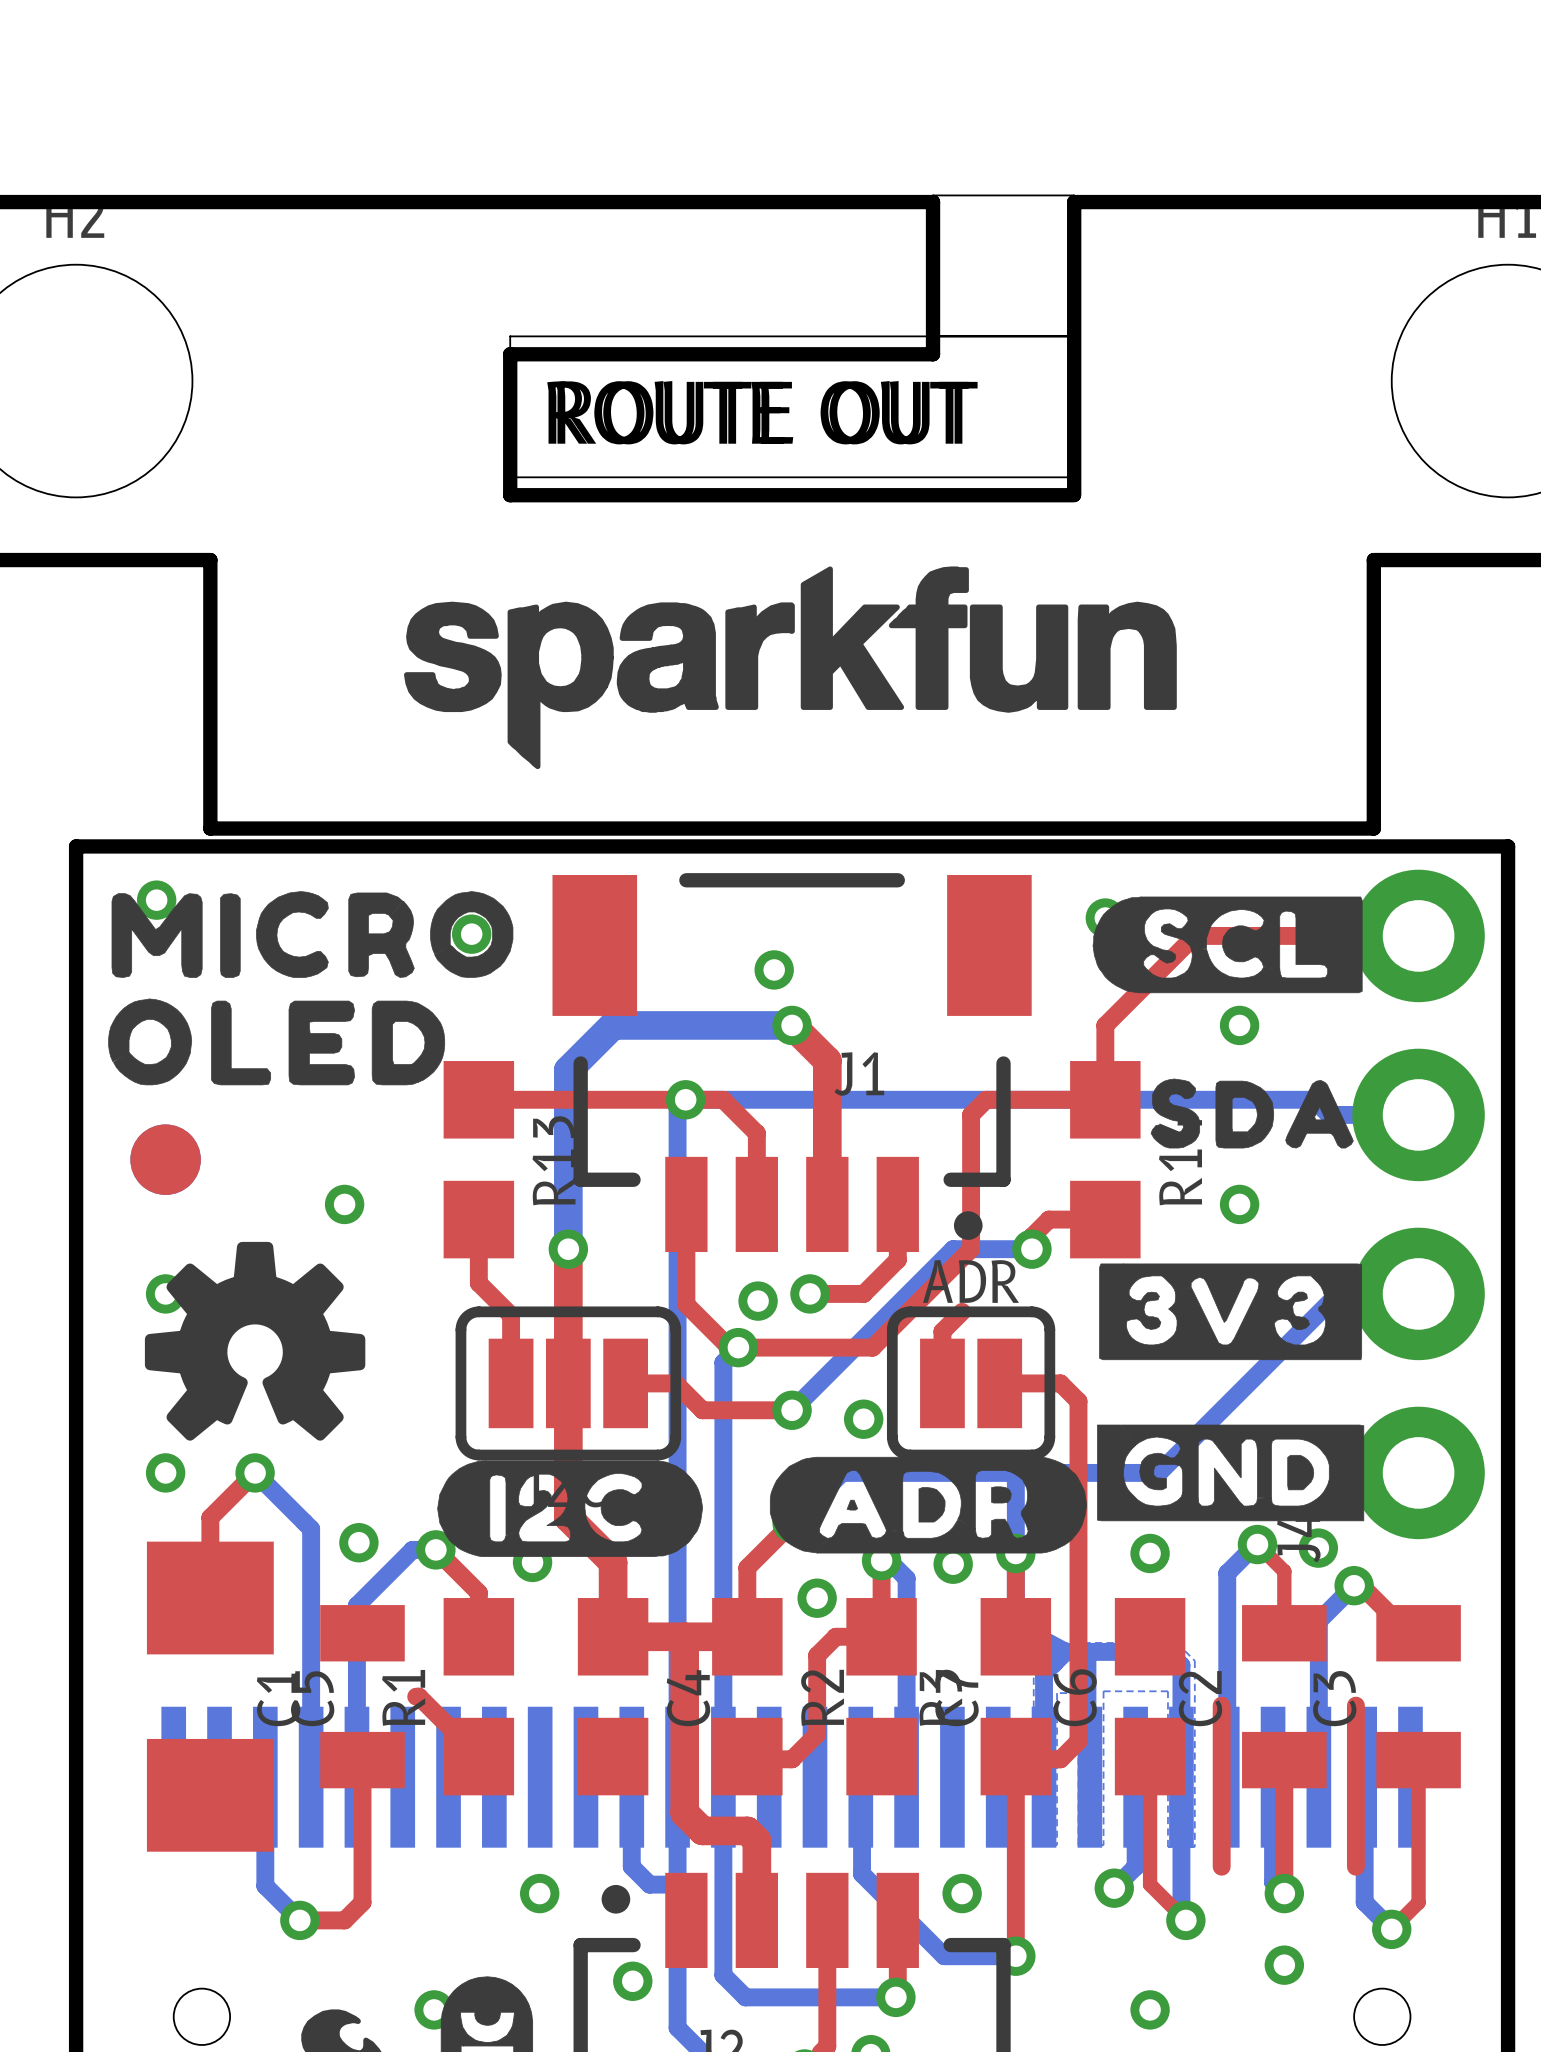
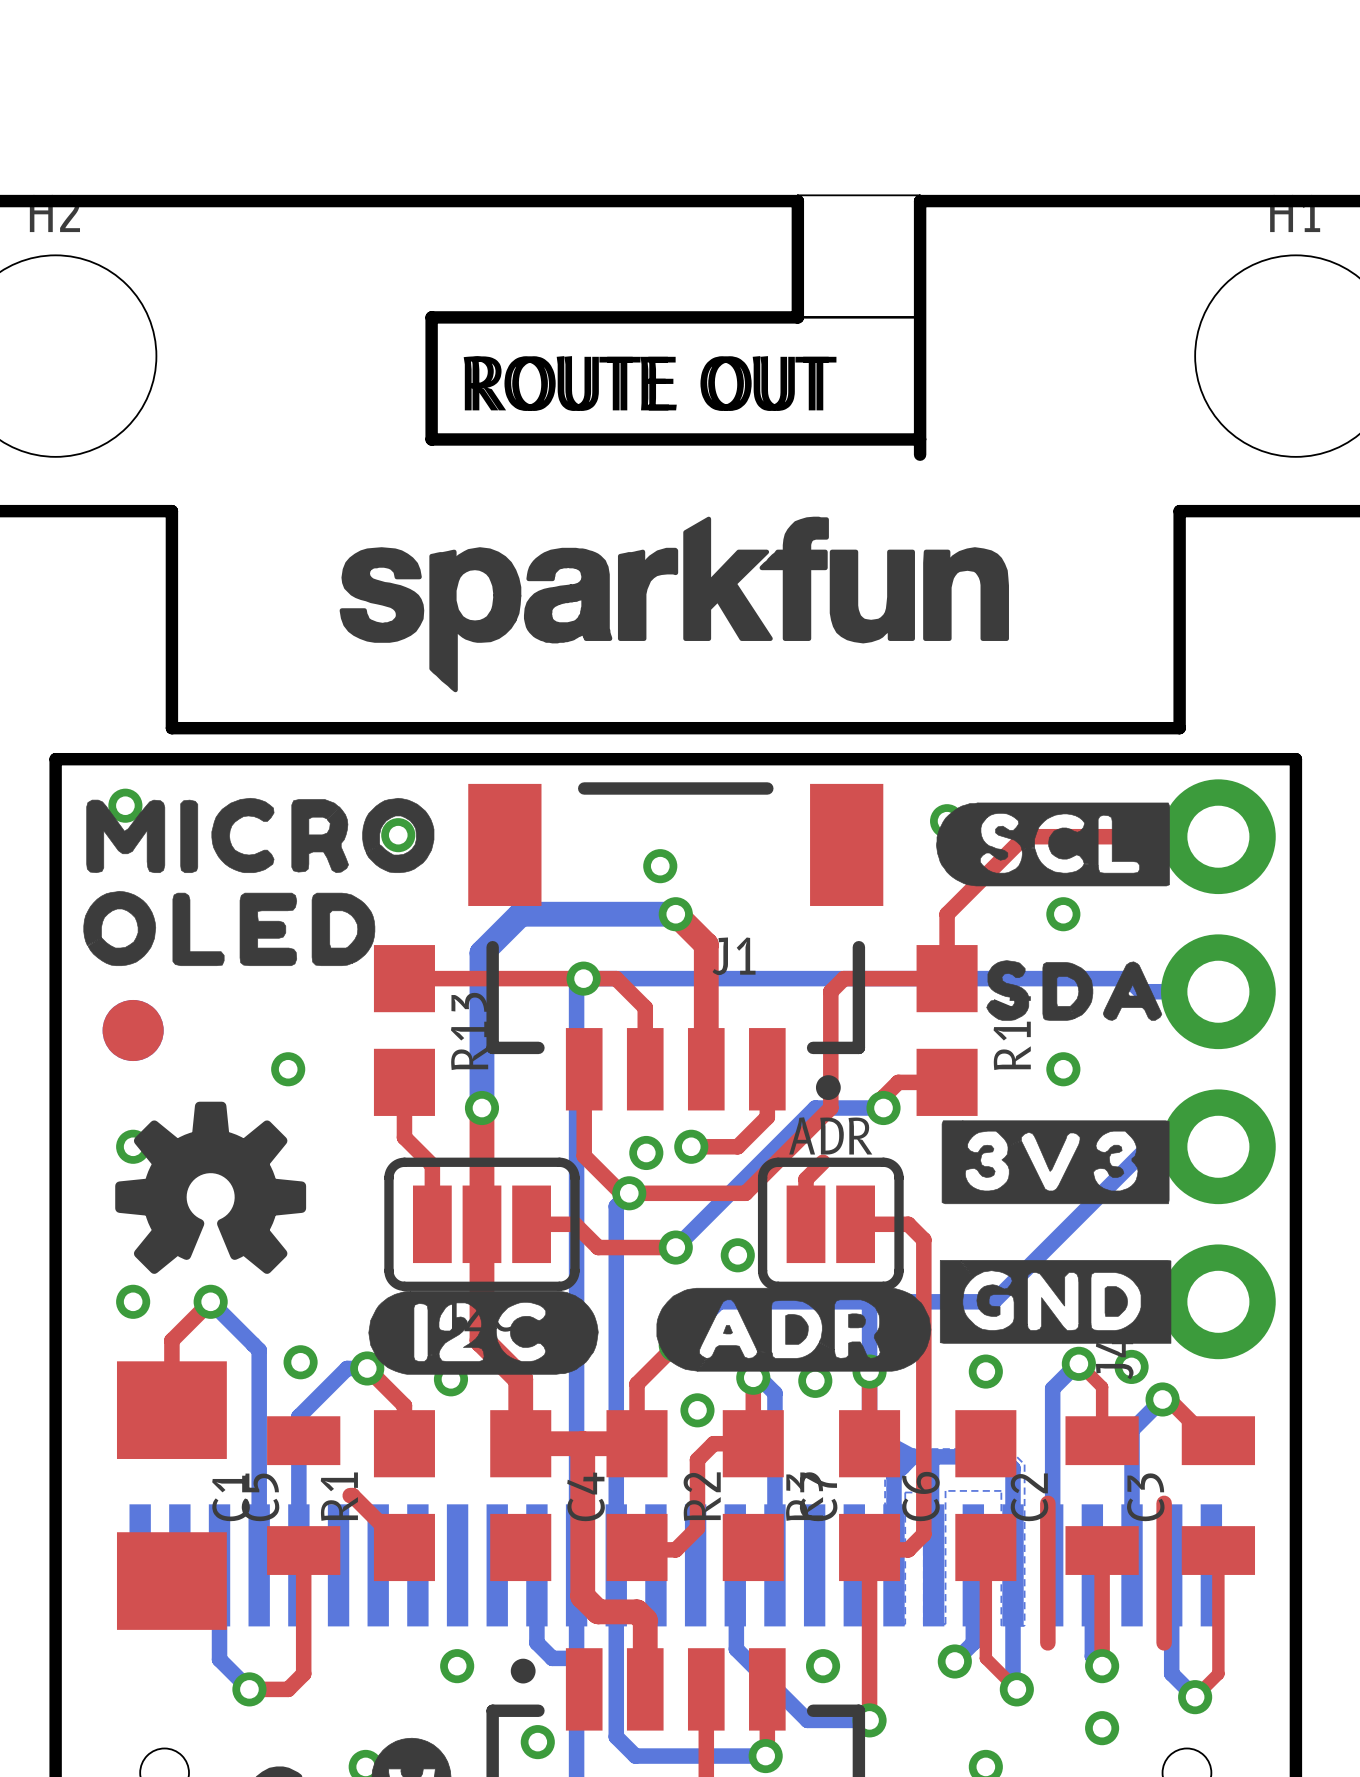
board edge: (933, 336) (933, 354) (510, 354) -> (797, 317) (431, 317) (431, 332)
board edge: (510, 477) (510, 495) (1073, 495) -> (431, 439) (919, 439)
board edge: (210, 810) (210, 828) (1373, 828) (1373, 810) -> (171, 728) (1179, 728)

